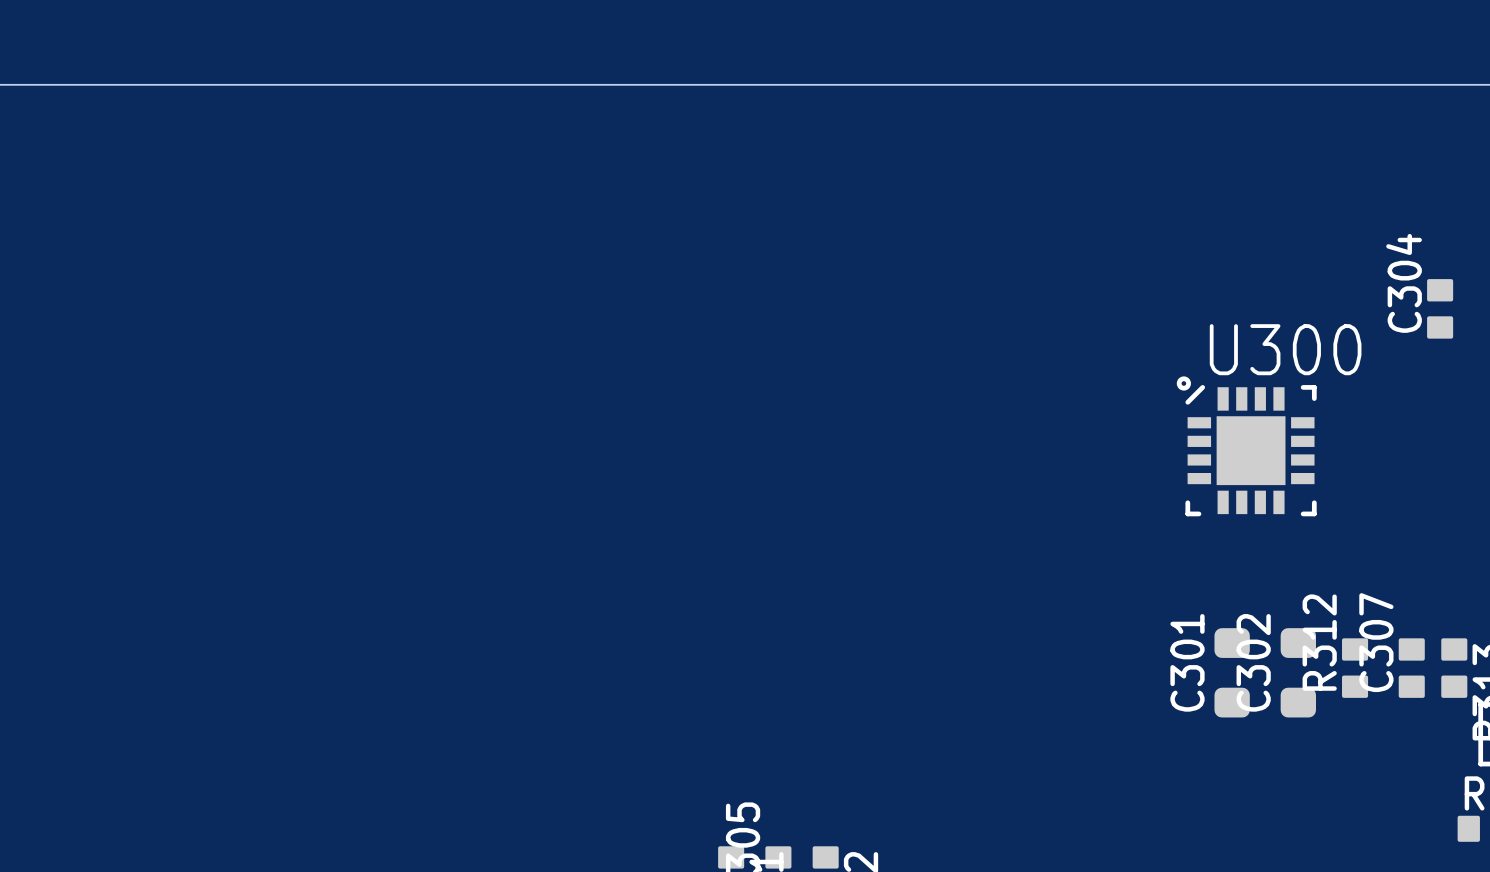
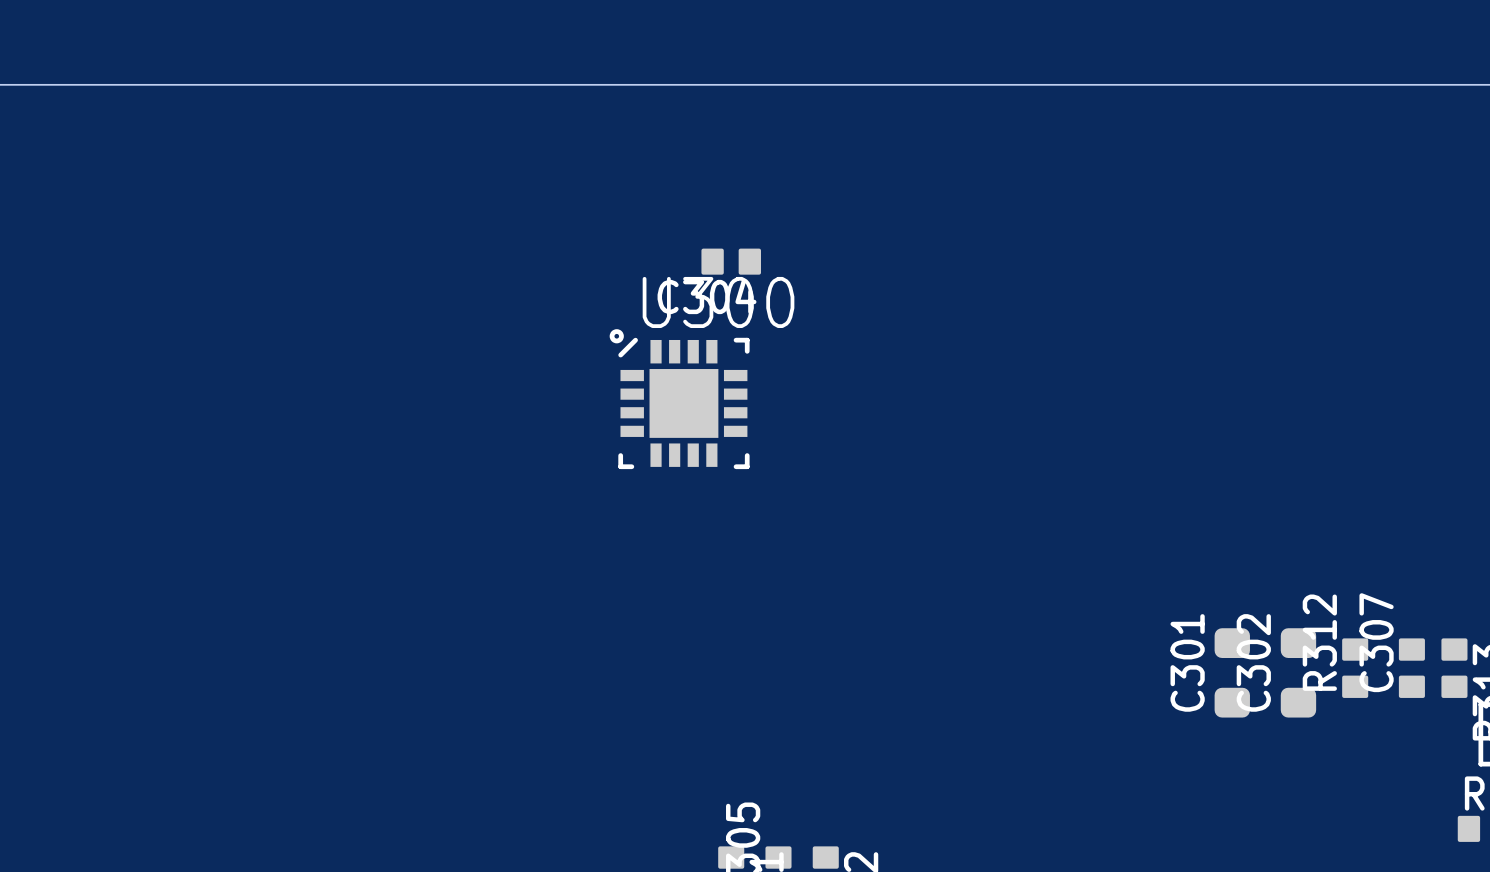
C304 rotation: 0° (1440, 308) -> 90° clockwise (731, 261)
C304 position: (1440, 308) -> (731, 261)
U300 position: (1246, 446) -> (679, 399)

